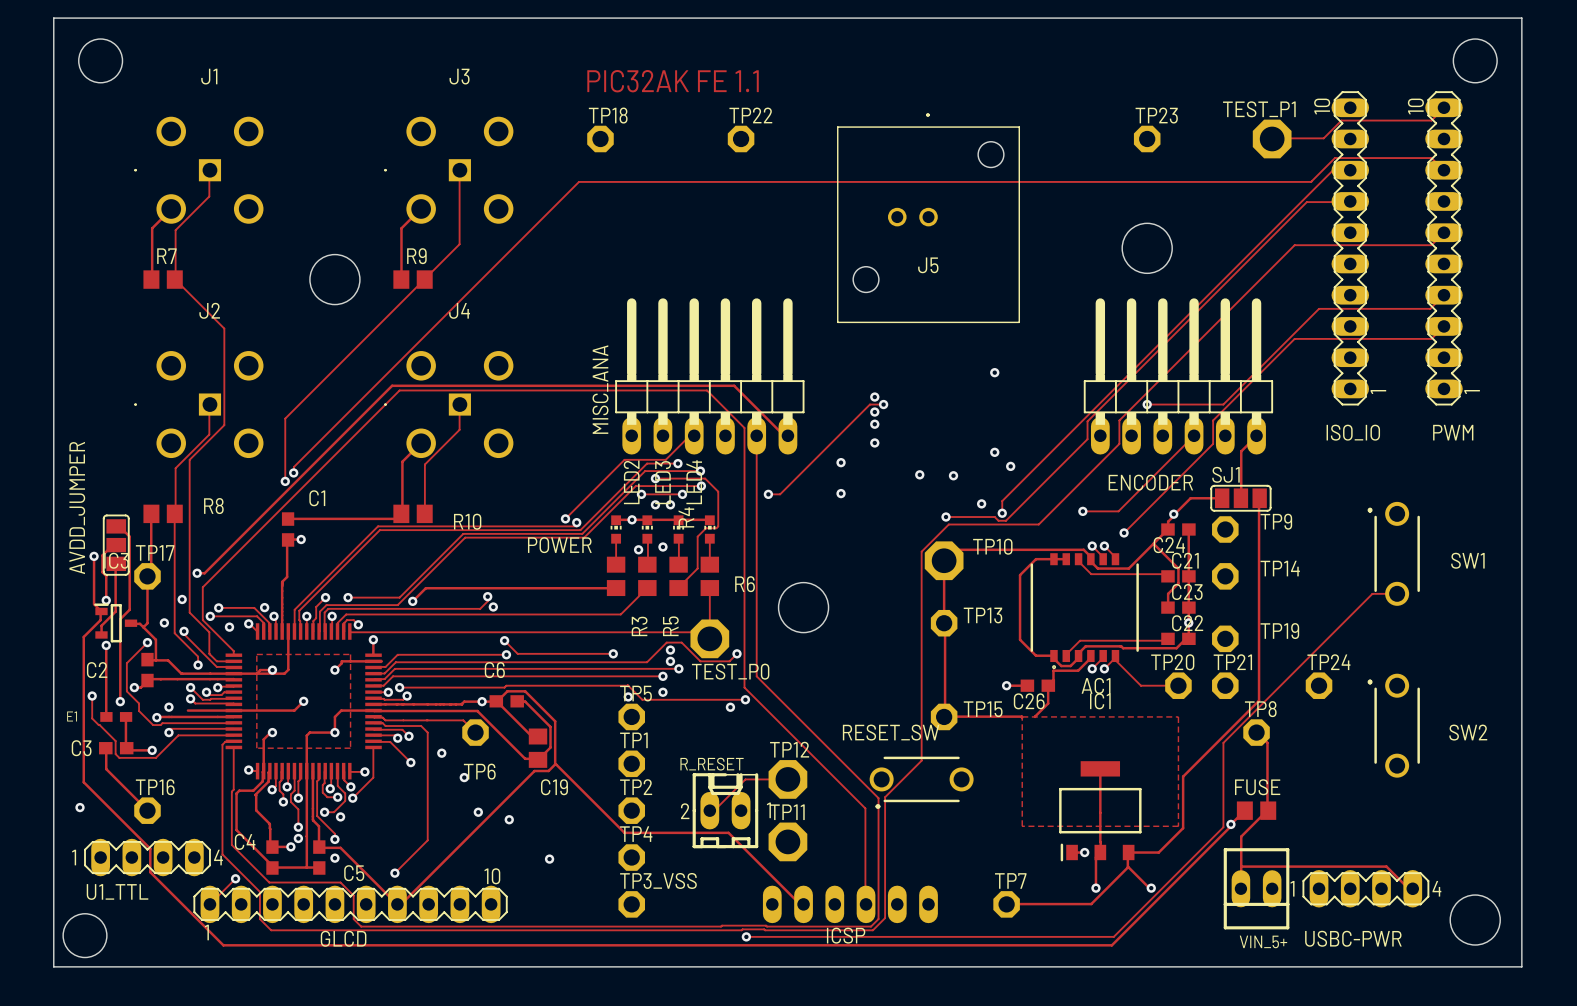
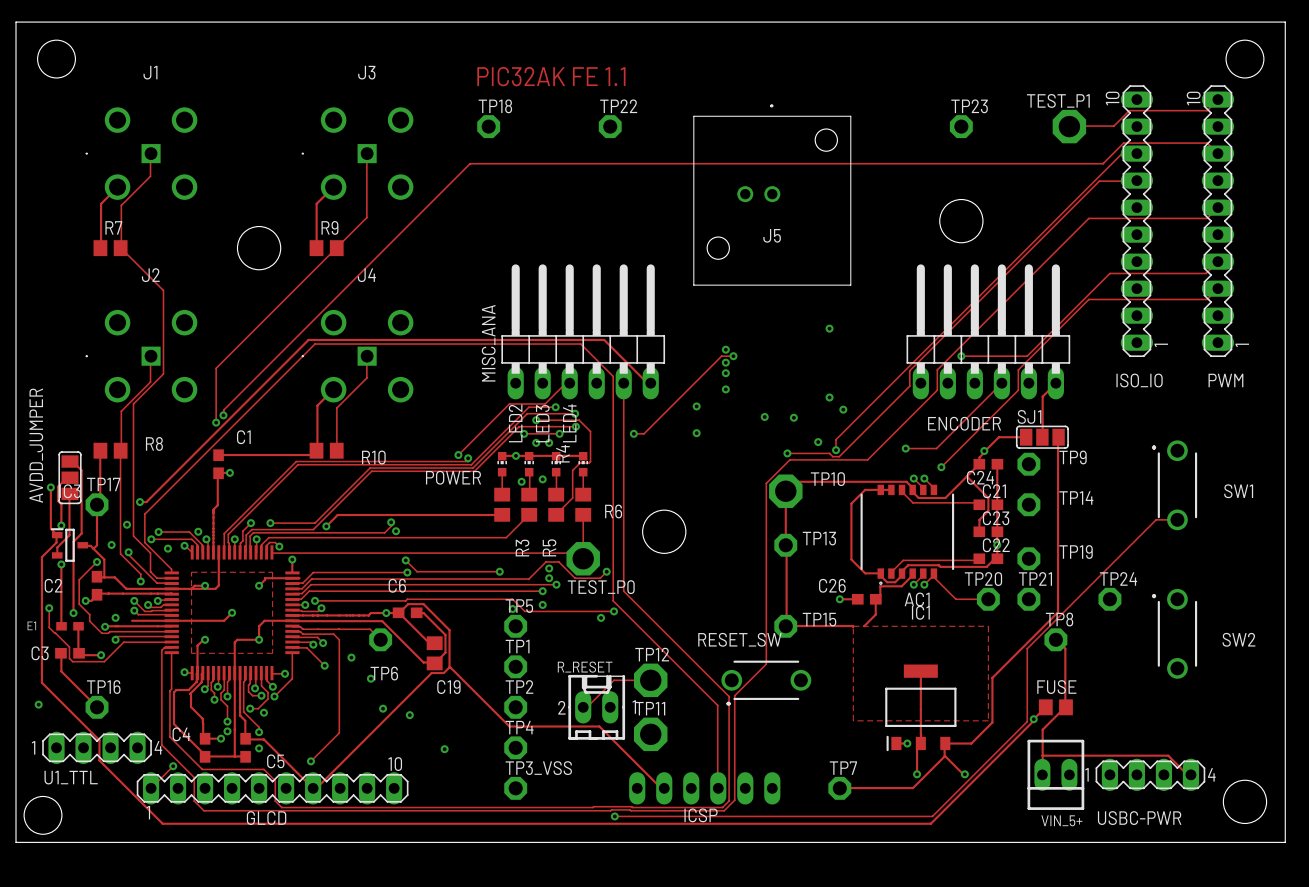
C26 name position: C26 (1029, 701) -> C26 (832, 585)

